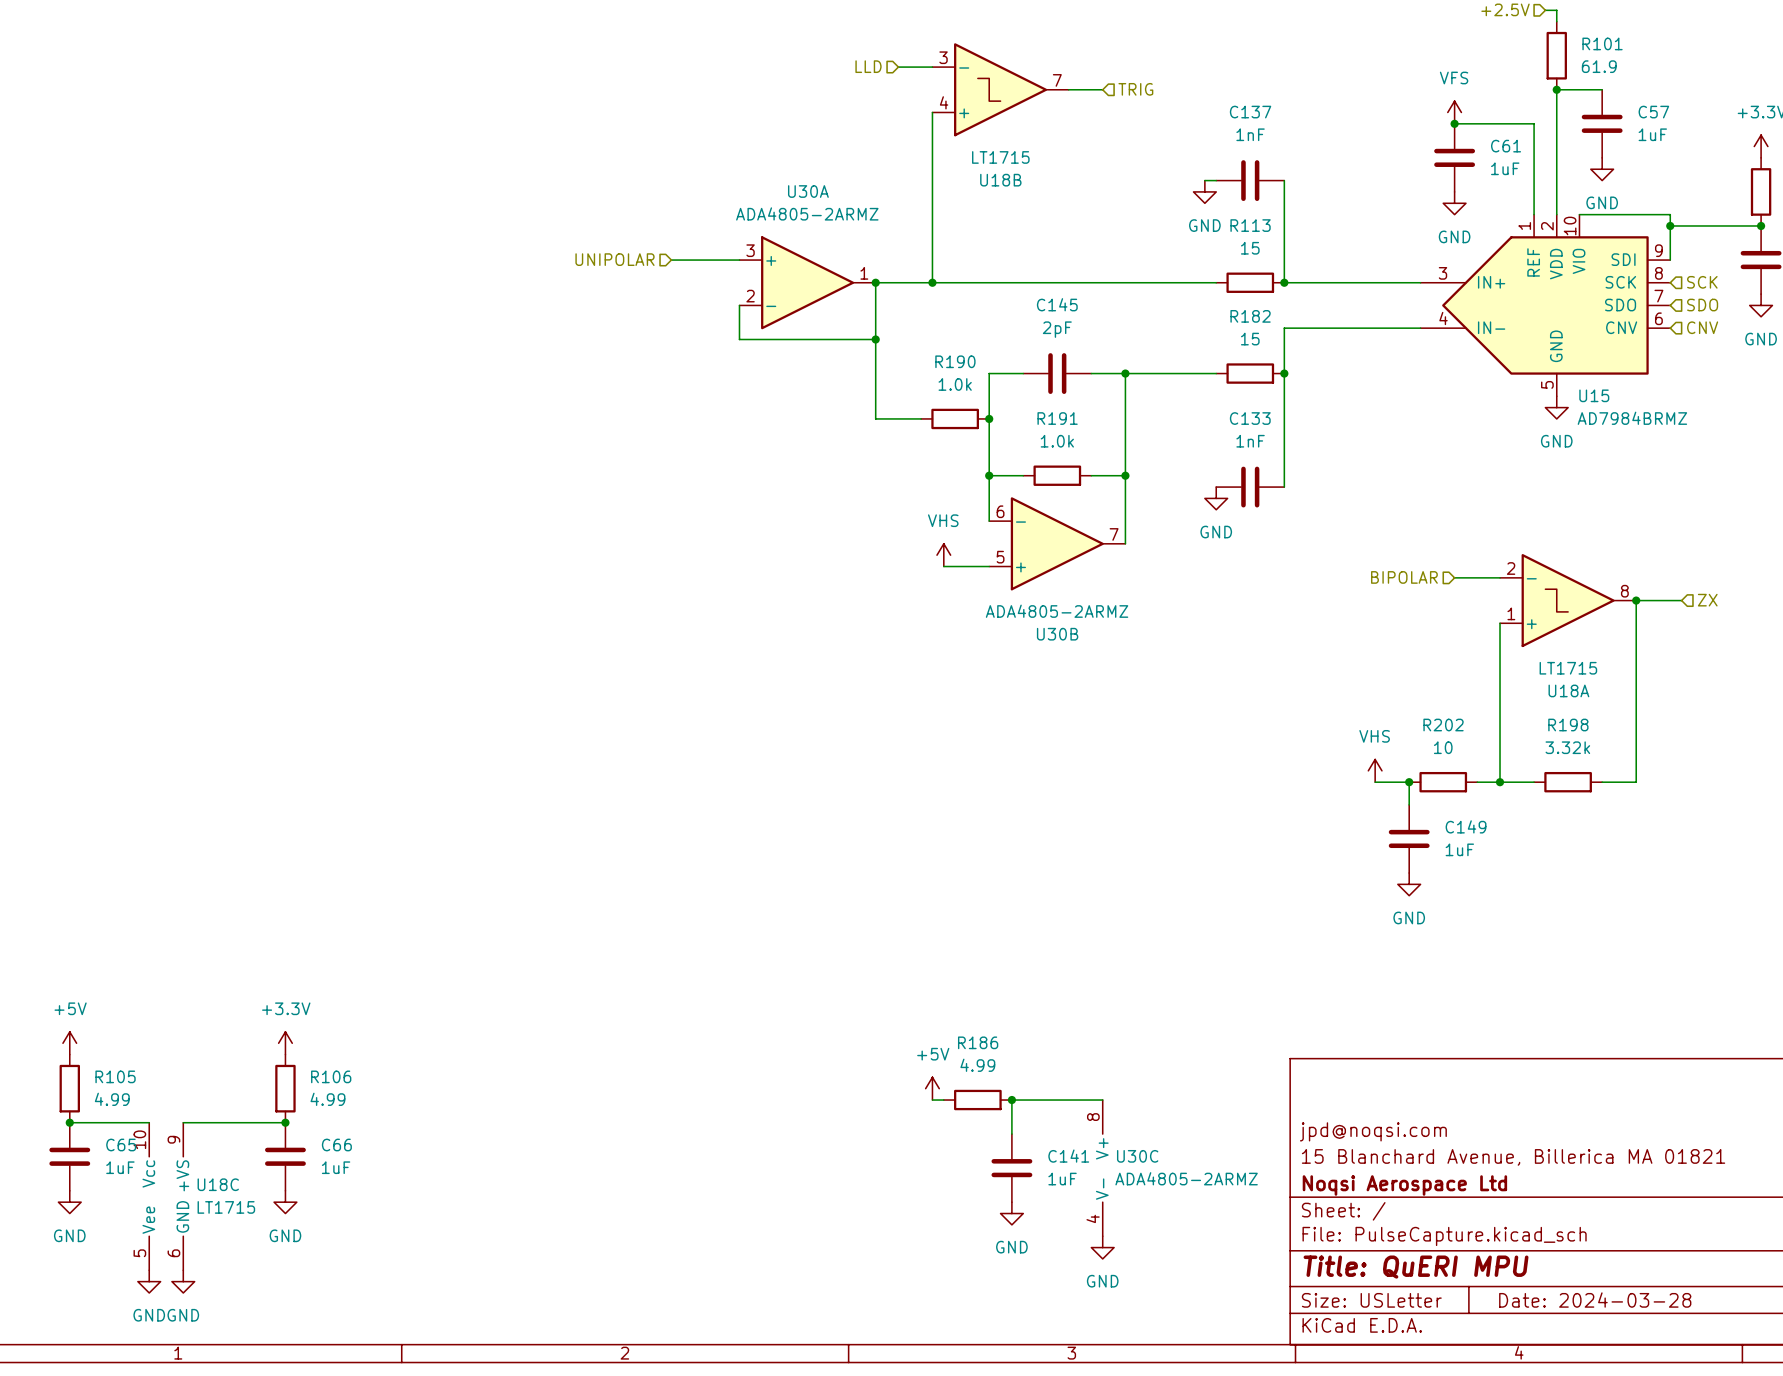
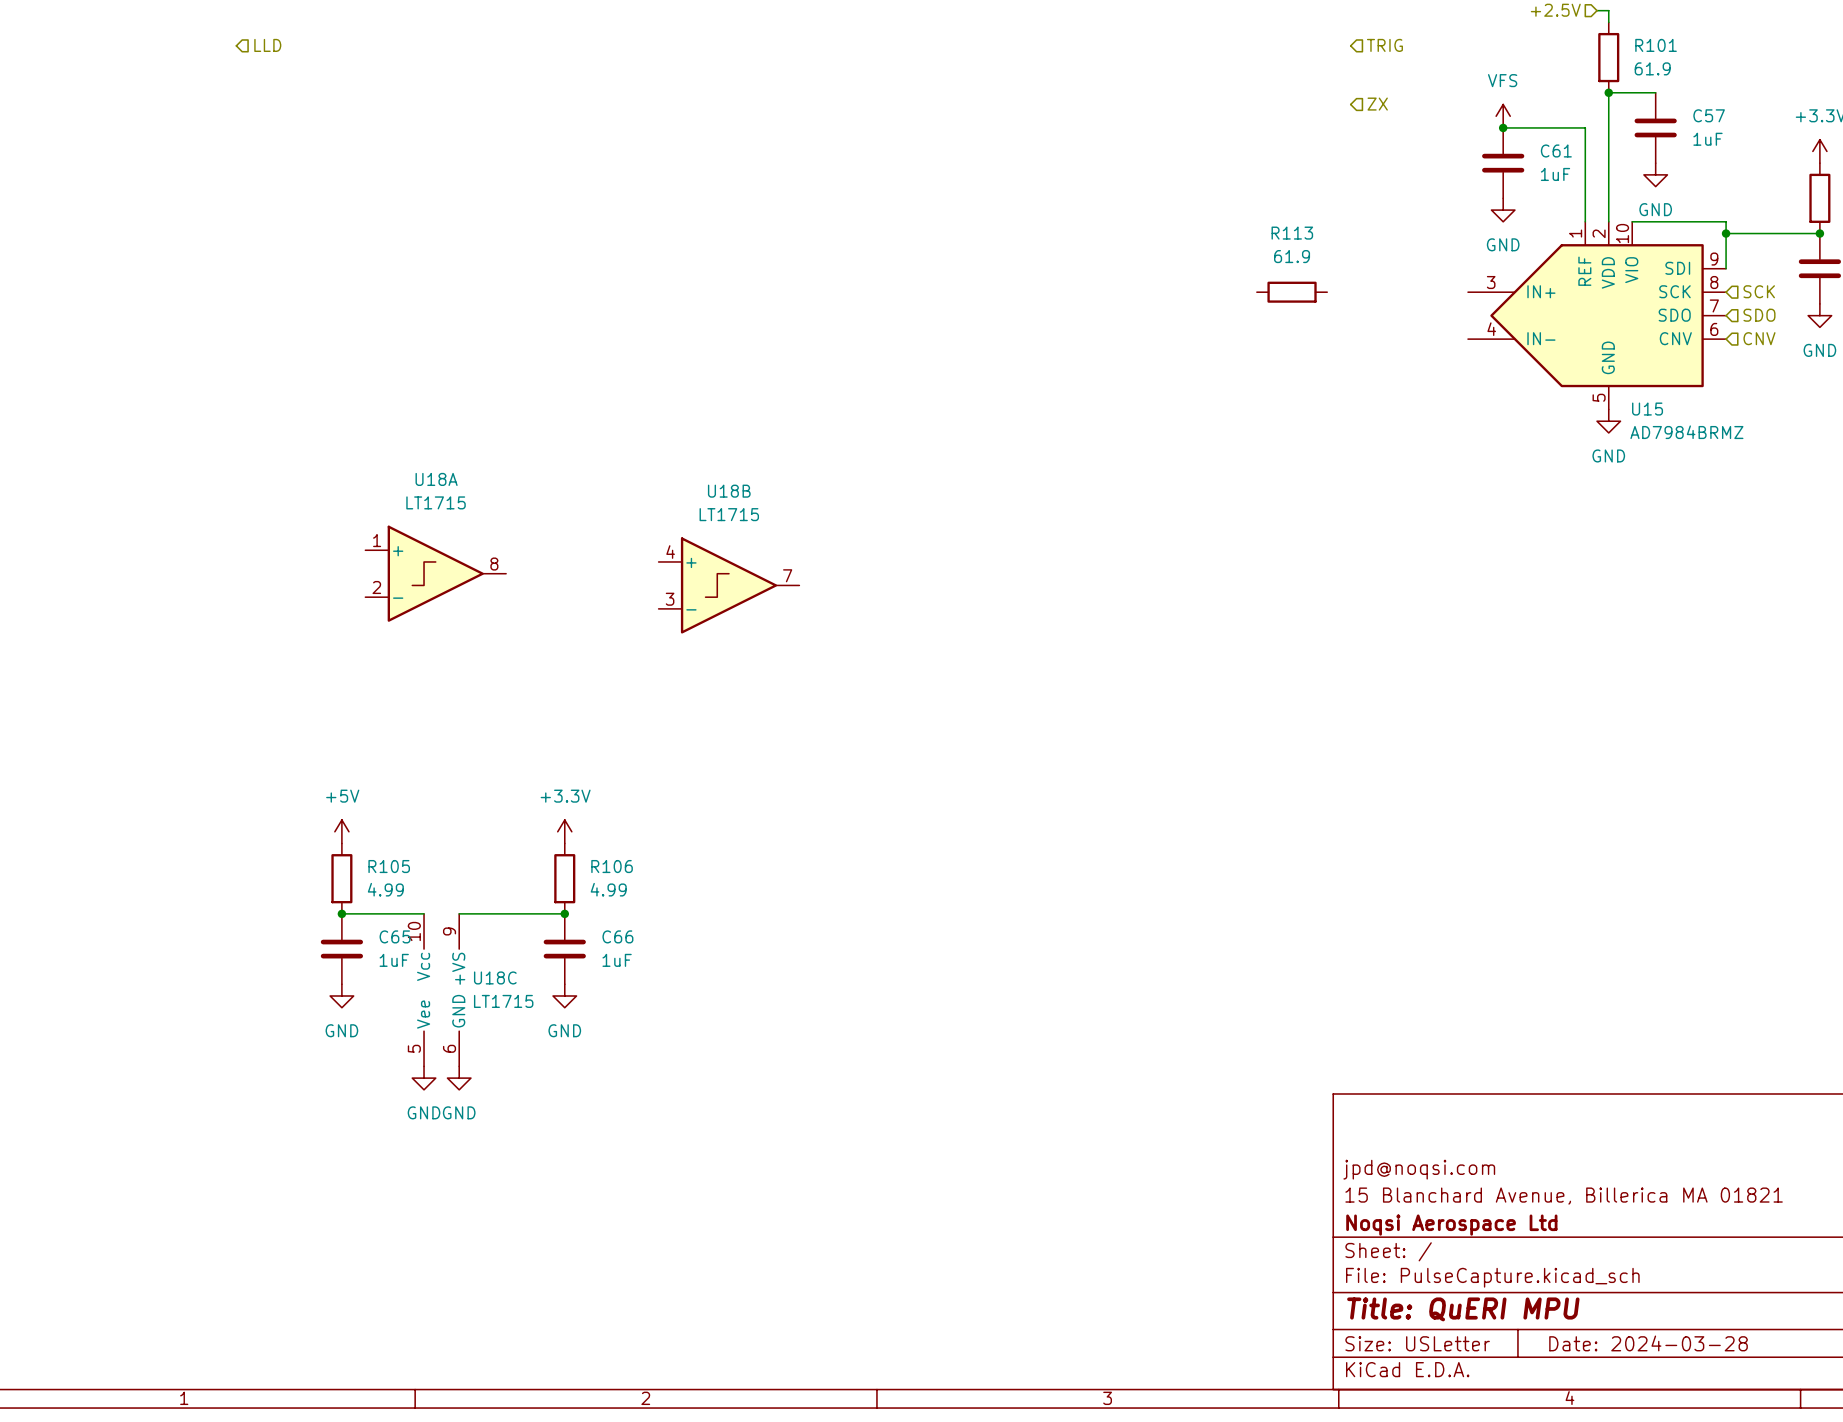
hierarchical label: none -> LLD (267, 45)
hierarchical label: LLD (868, 66) -> none
wire: (898, 67) (932, 67) -> none
U18B flip: as is (1000, 89) -> up-down (729, 585)
U18B position: (1000, 89) -> (729, 585)
wire: (1068, 89) (1102, 89) -> none
hierarchical label position: TRIG (1135, 89) -> TRIG (1384, 45)
hierarchical label: none -> ZX (1377, 104)
wire: (932, 112) (932, 282) -> none
wire: (1204, 180) (1216, 180) -> none
C137: 1nF (1250, 180) -> none
wire: (1284, 180) (1284, 282) (1420, 282) -> none
power symbol: GND (1204, 191) -> none
R113 value: 15 (1250, 248) -> 61.9 (1292, 256)
hierarchical label: UNIPOLAR (614, 259) -> none
wire: (671, 260) (739, 260) -> none
U30A: ADA4805-2ARMZ (807, 282) -> none
junction: (875, 282) -> none
junction: (932, 282) -> none
wire: (1216, 282) (875, 282) (875, 418) (921, 418) -> none
junction: (1284, 282) -> none
wire: (739, 305) (739, 339) (875, 339) -> none
wire: (1420, 328) (1284, 328) (1284, 487) -> none
junction: (875, 339) -> none
wire: (1023, 373) (989, 373) (989, 521) -> none
C145: 2pF (1057, 373) -> none
wire: (1091, 373) (1216, 373) -> none
wire: (1125, 373) (1125, 543) -> none
junction: (1125, 373) -> none
R182: 15 (1250, 373) -> none
junction: (1284, 373) -> none
R190: 1.0k (955, 418) -> none
junction: (989, 418) -> none
wire: (989, 475) (1023, 475) -> none
junction: (989, 475) -> none
R191: 1.0k (1057, 475) -> none
wire: (1091, 475) (1125, 475) -> none
junction: (1125, 475) -> none
C133: 1nF (1250, 487) -> none
power symbol: GND (1216, 498) -> none
U30B: ADA4805-2ARMZ (1057, 543) -> none
power symbol: VHS (943, 555) -> none
wire: (943, 566) (989, 566) -> none
hierarchical label: BIPOLAR (1404, 577) -> none
wire: (1454, 577) (1500, 577) -> none
U18A flip: as is (1568, 600) -> up-down (435, 573)
U18A position: (1568, 600) -> (435, 573)
junction: (1636, 600) -> none
wire: (1681, 600) (1636, 600) (1636, 782) (1602, 782) -> none
hierarchical label: ZX (1707, 600) -> none
wire: (1500, 623) (1500, 782) -> none
power symbol: VHS (1375, 770) -> none
wire: (1375, 782) (1409, 782) (1409, 804) -> none
junction: (1409, 782) -> none
R202: 10 (1443, 782) -> none
wire: (1477, 782) (1534, 782) -> none
junction: (1500, 782) -> none
R198: 3.32k (1568, 782) -> none
power symbol: none -> +5V (341, 831)
power symbol: none -> +3.3V (564, 831)
C149: 1uF (1409, 838) -> none
wire: none -> (341, 913) (424, 913)
junction: none -> (341, 913)
wire: none -> (459, 913) (564, 913)
junction: none -> (564, 913)
power symbol: GND (1409, 884) -> none
power symbol: none -> GND (341, 996)
power symbol: none -> GND (564, 996)
power symbol: +5V (69, 1043) -> none
power symbol: +3.3V (285, 1043) -> none
power symbol: none -> GND (424, 1078)
power symbol: none -> GND (459, 1078)
R105 position: (69, 1088) -> (341, 878)
R106 position: (285, 1088) -> (564, 878)
power symbol: +5V (932, 1088) -> none
wire: (932, 1100) (943, 1100) -> none
R186: 4.99 (977, 1100) -> none
junction: (1011, 1100) -> none
wire: (1102, 1100) (1011, 1100) (1011, 1134) -> none
wire: (69, 1122) (149, 1122) -> none
junction: (69, 1122) -> none
wire: (183, 1122) (285, 1122) -> none
junction: (285, 1122) -> none
C65 position: (69, 1156) -> (341, 949)
C66 position: (285, 1156) -> (564, 949)
C141: 1uF (1011, 1168) -> none
U30C: ADA4805-2ARMZ (1102, 1168) -> none
U18C position: (166, 1196) -> (441, 990)
power symbol: GND (69, 1202) -> none
power symbol: GND (285, 1202) -> none
power symbol: GND (1011, 1213) -> none
power symbol: GND (1102, 1247) -> none
power symbol: GND (149, 1281) -> none
power symbol: GND (183, 1281) -> none

